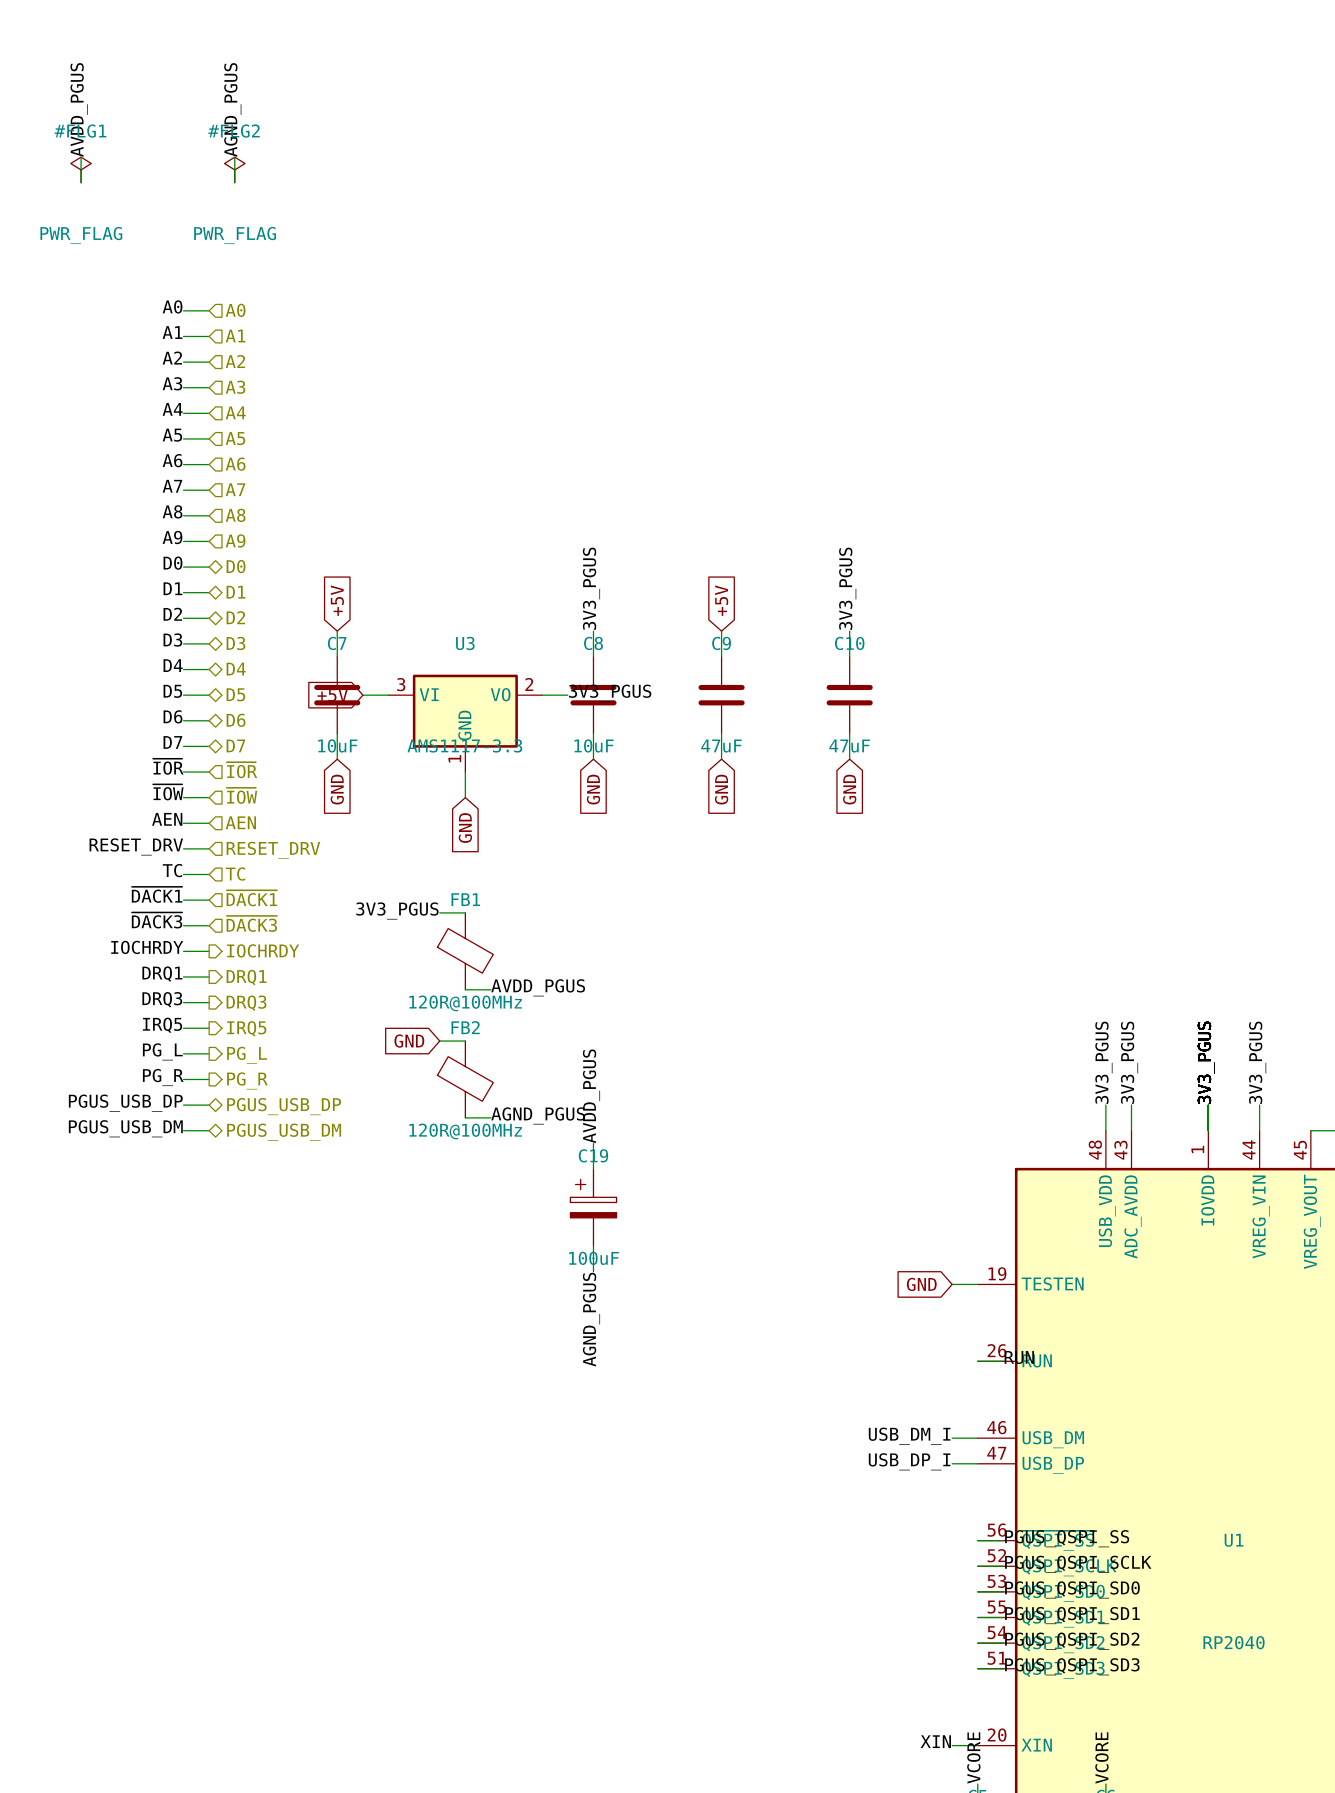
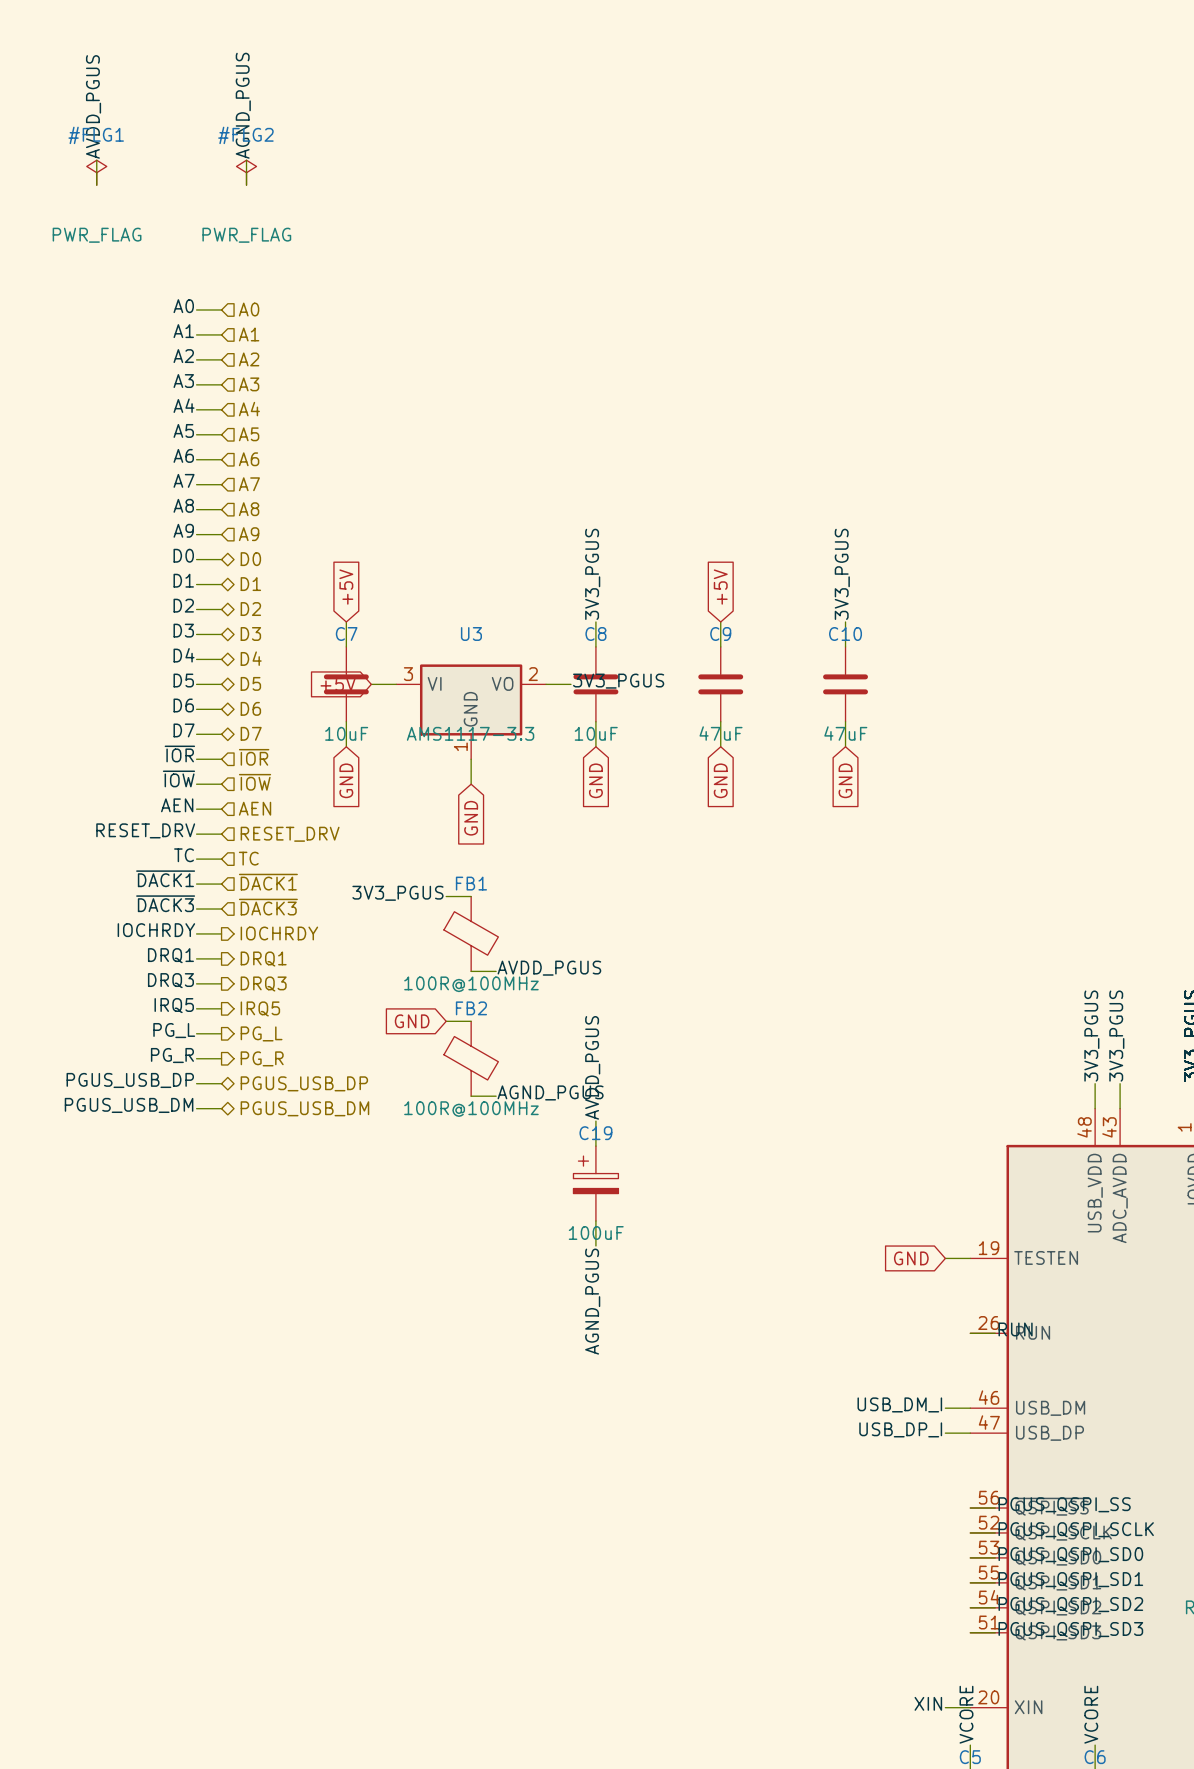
FB1 value: 120R@100MHz (465, 1003) -> 100R@100MHz (471, 984)
FB2 value: 120R@100MHz (465, 1131) -> 100R@100MHz (471, 1109)

